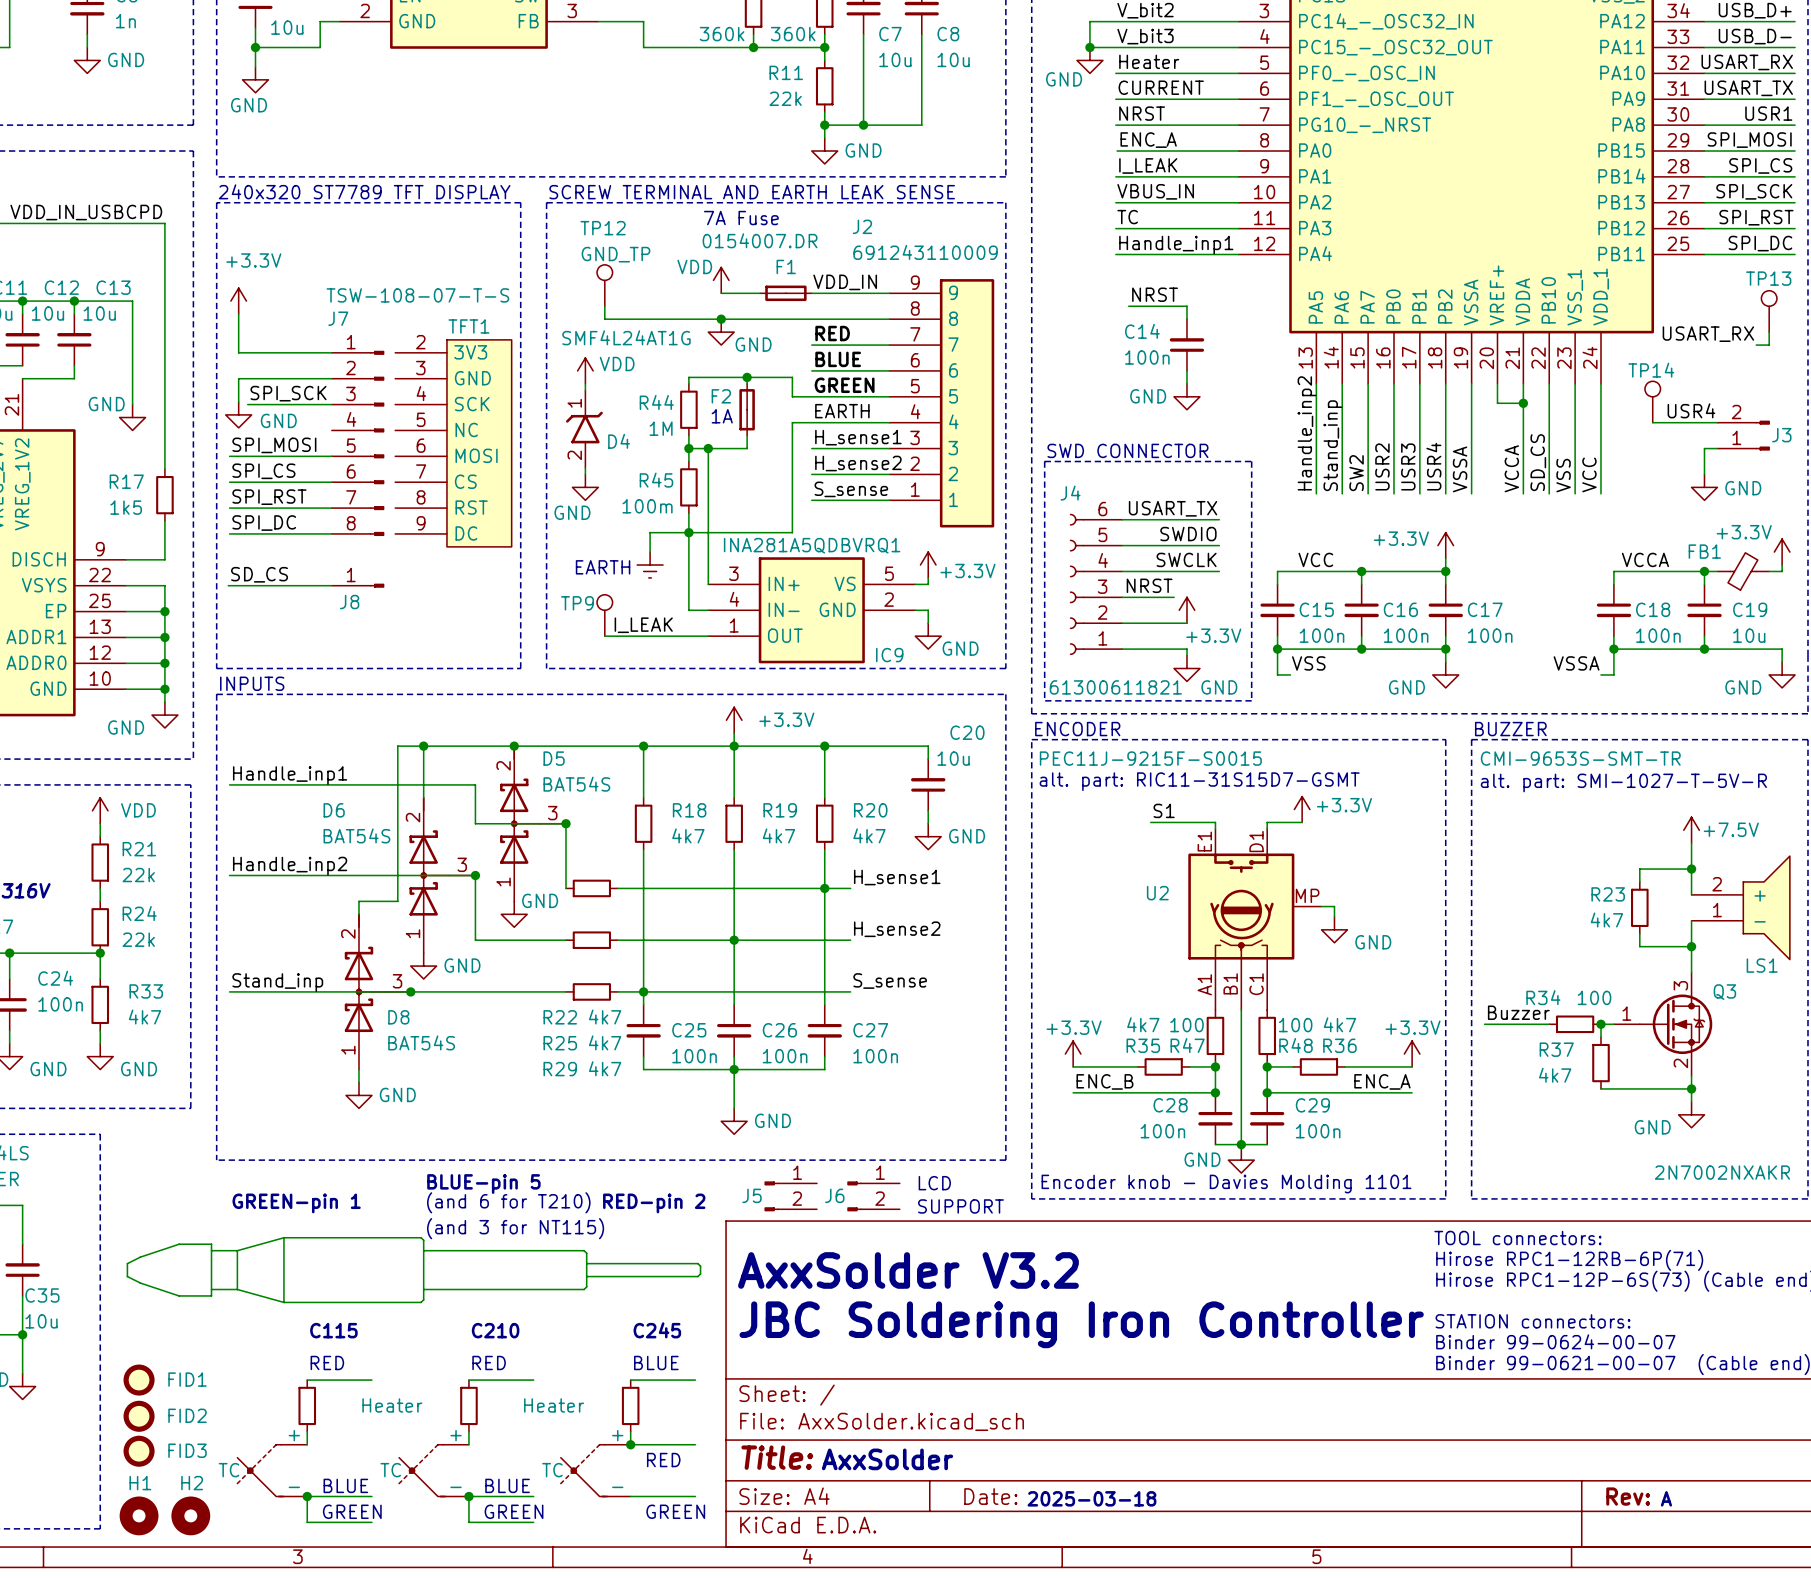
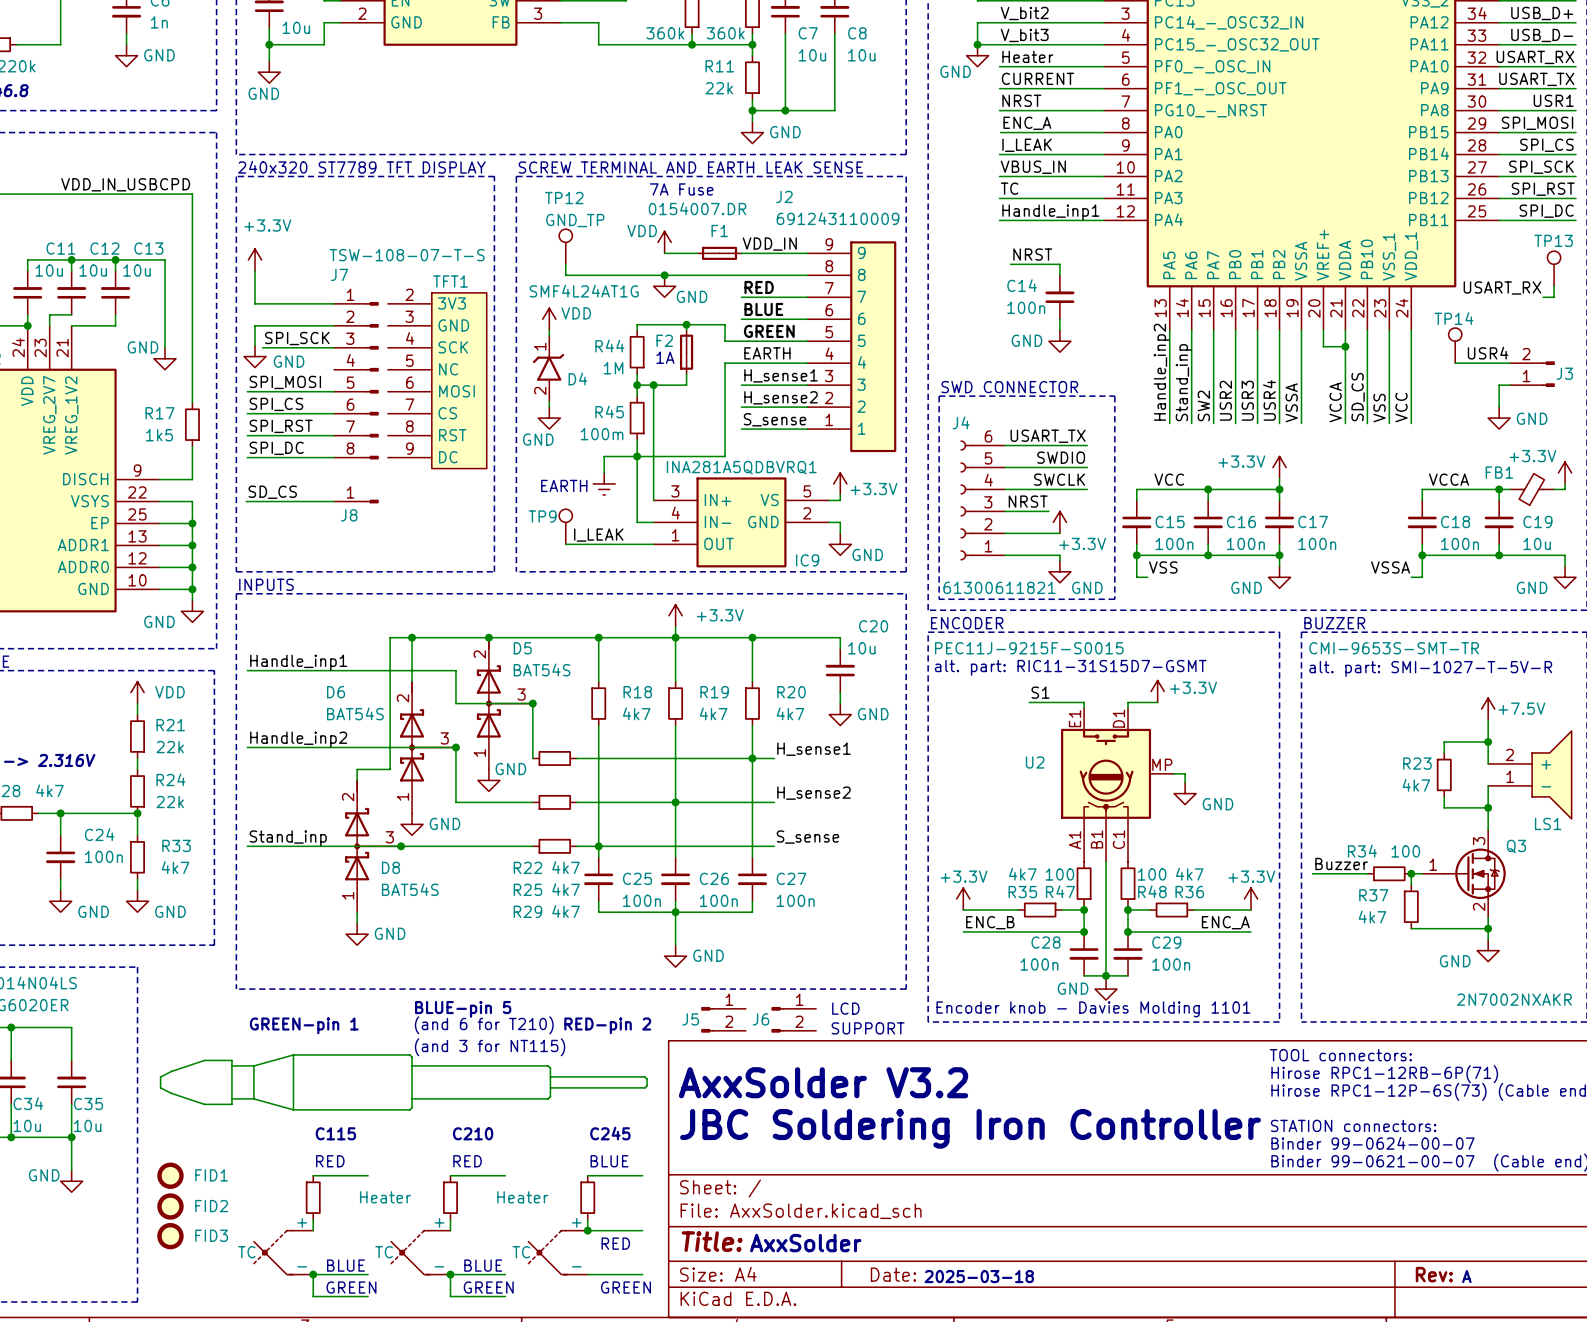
H1: (139, 1515) -> none
H2: (190, 1515) -> none

